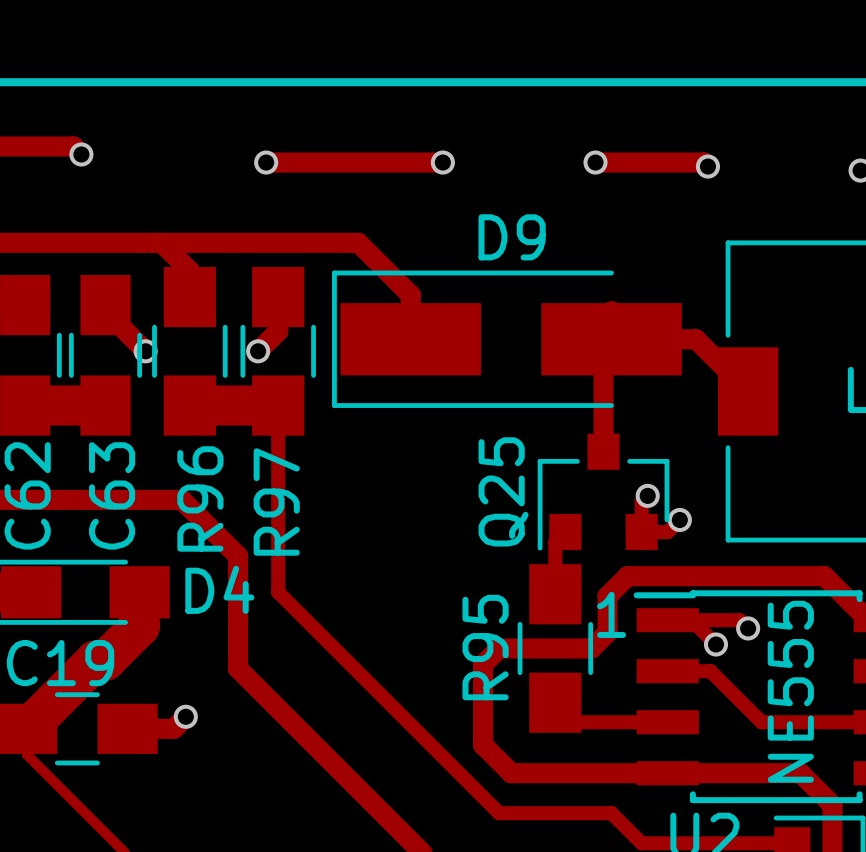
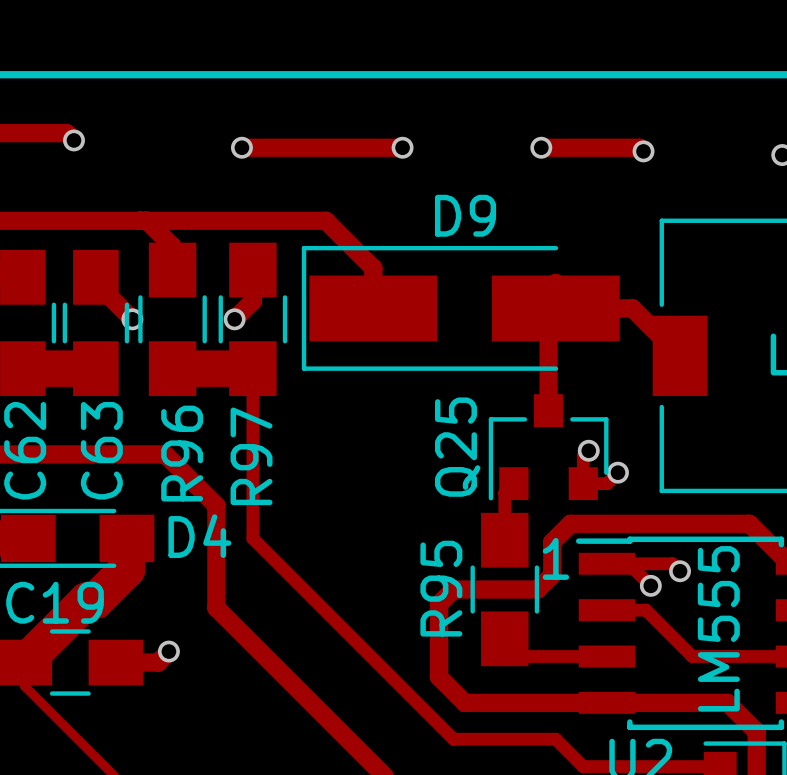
text: NE555 (790, 691) -> LM555 (718, 628)

